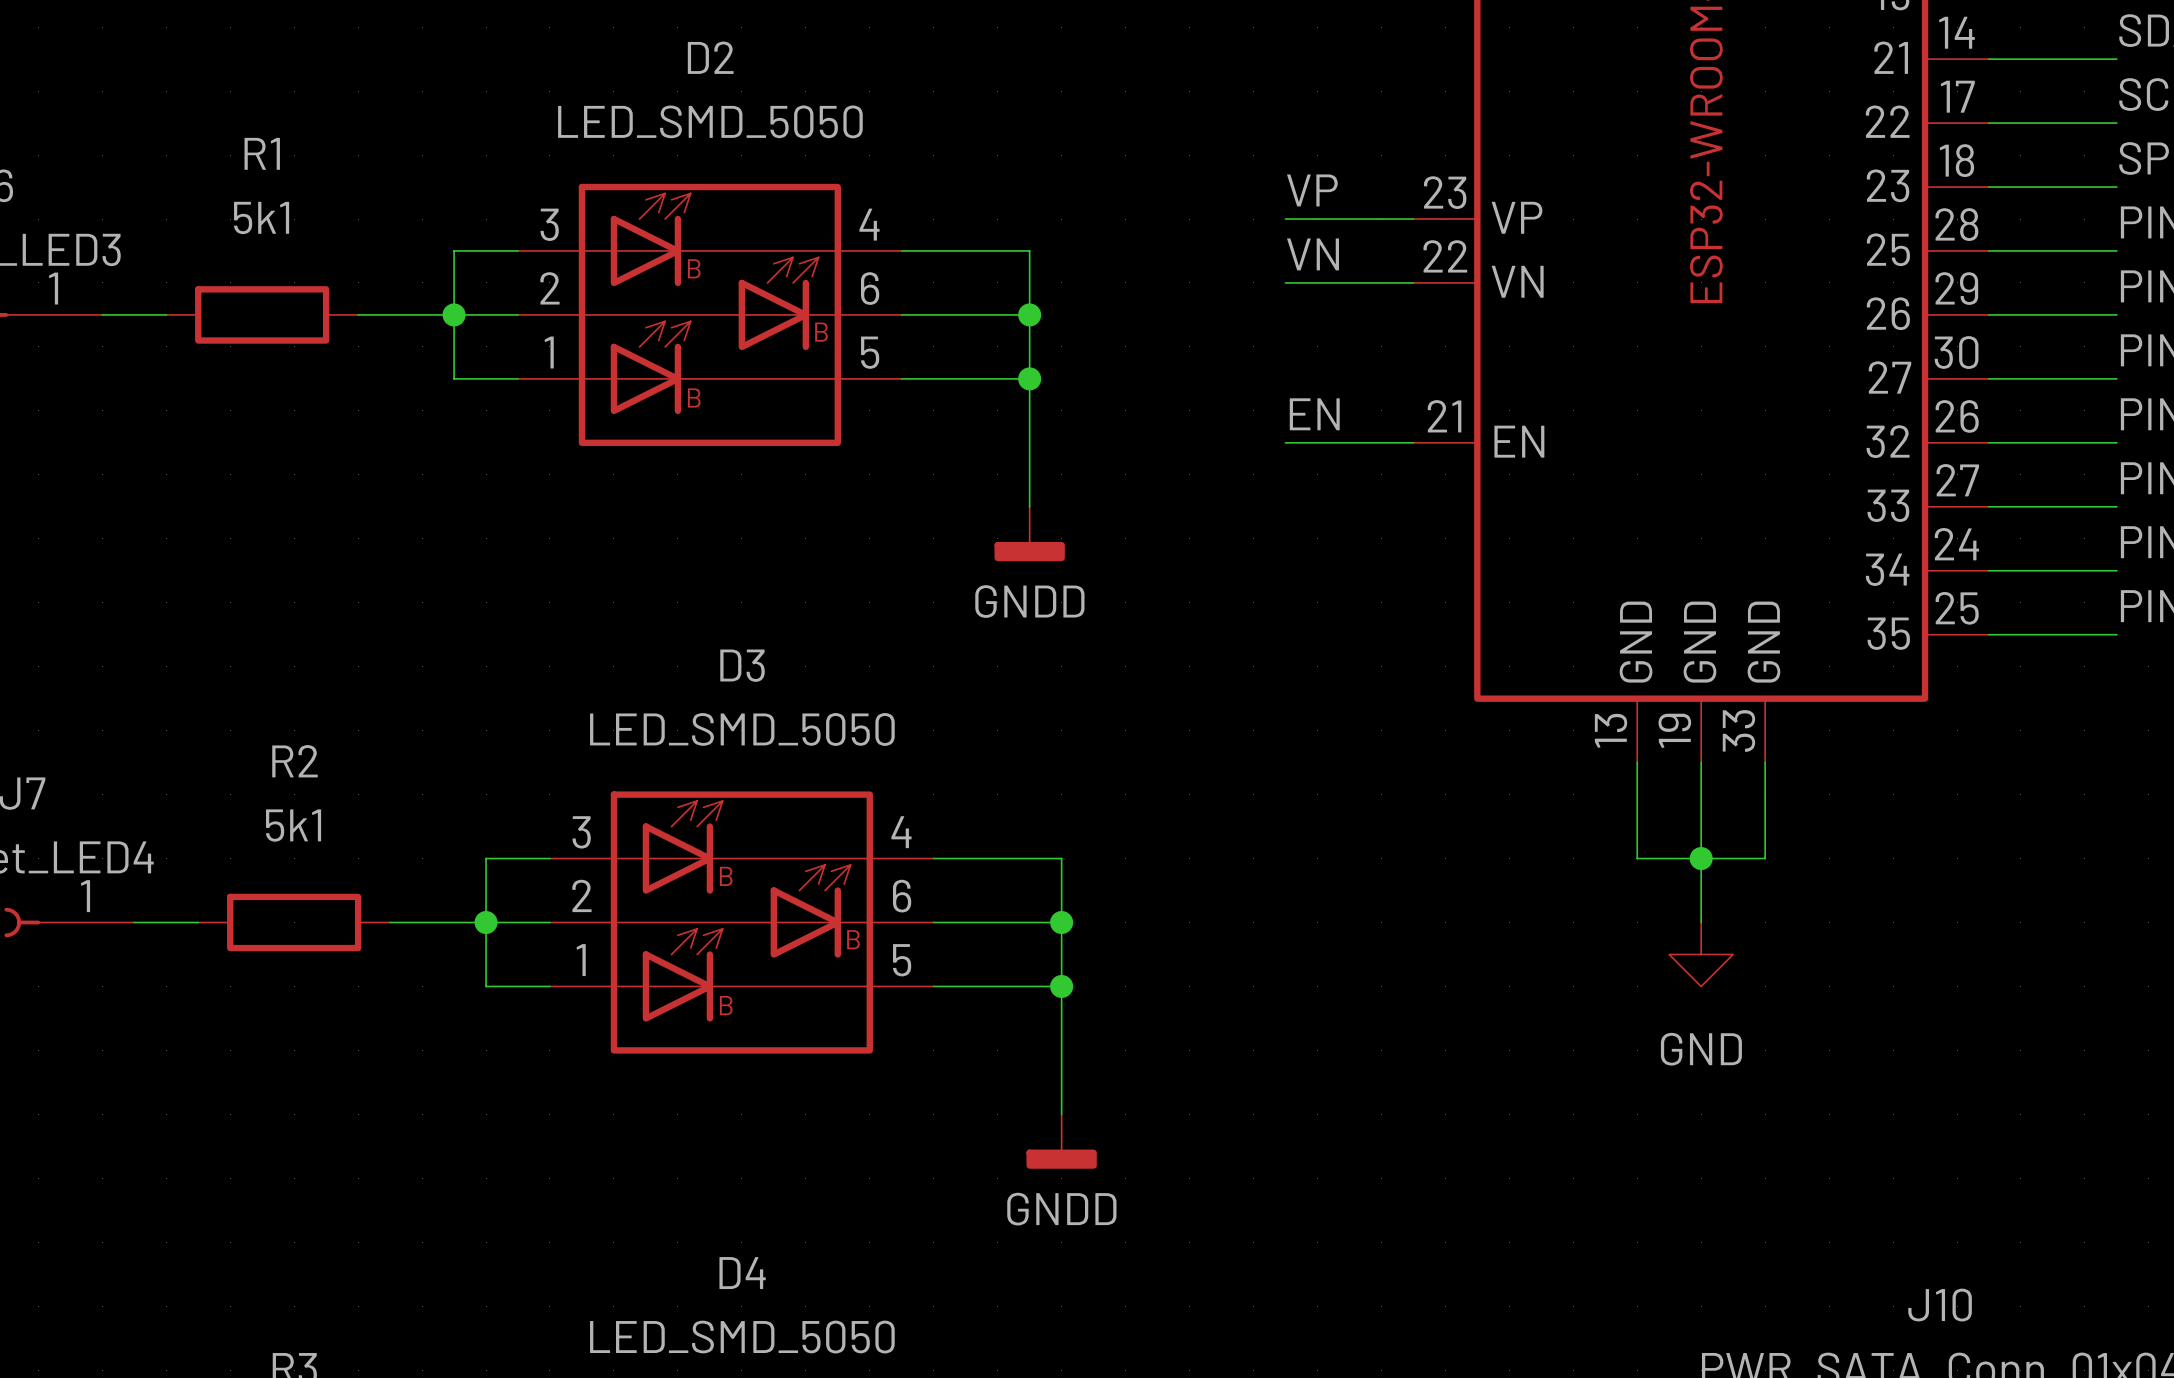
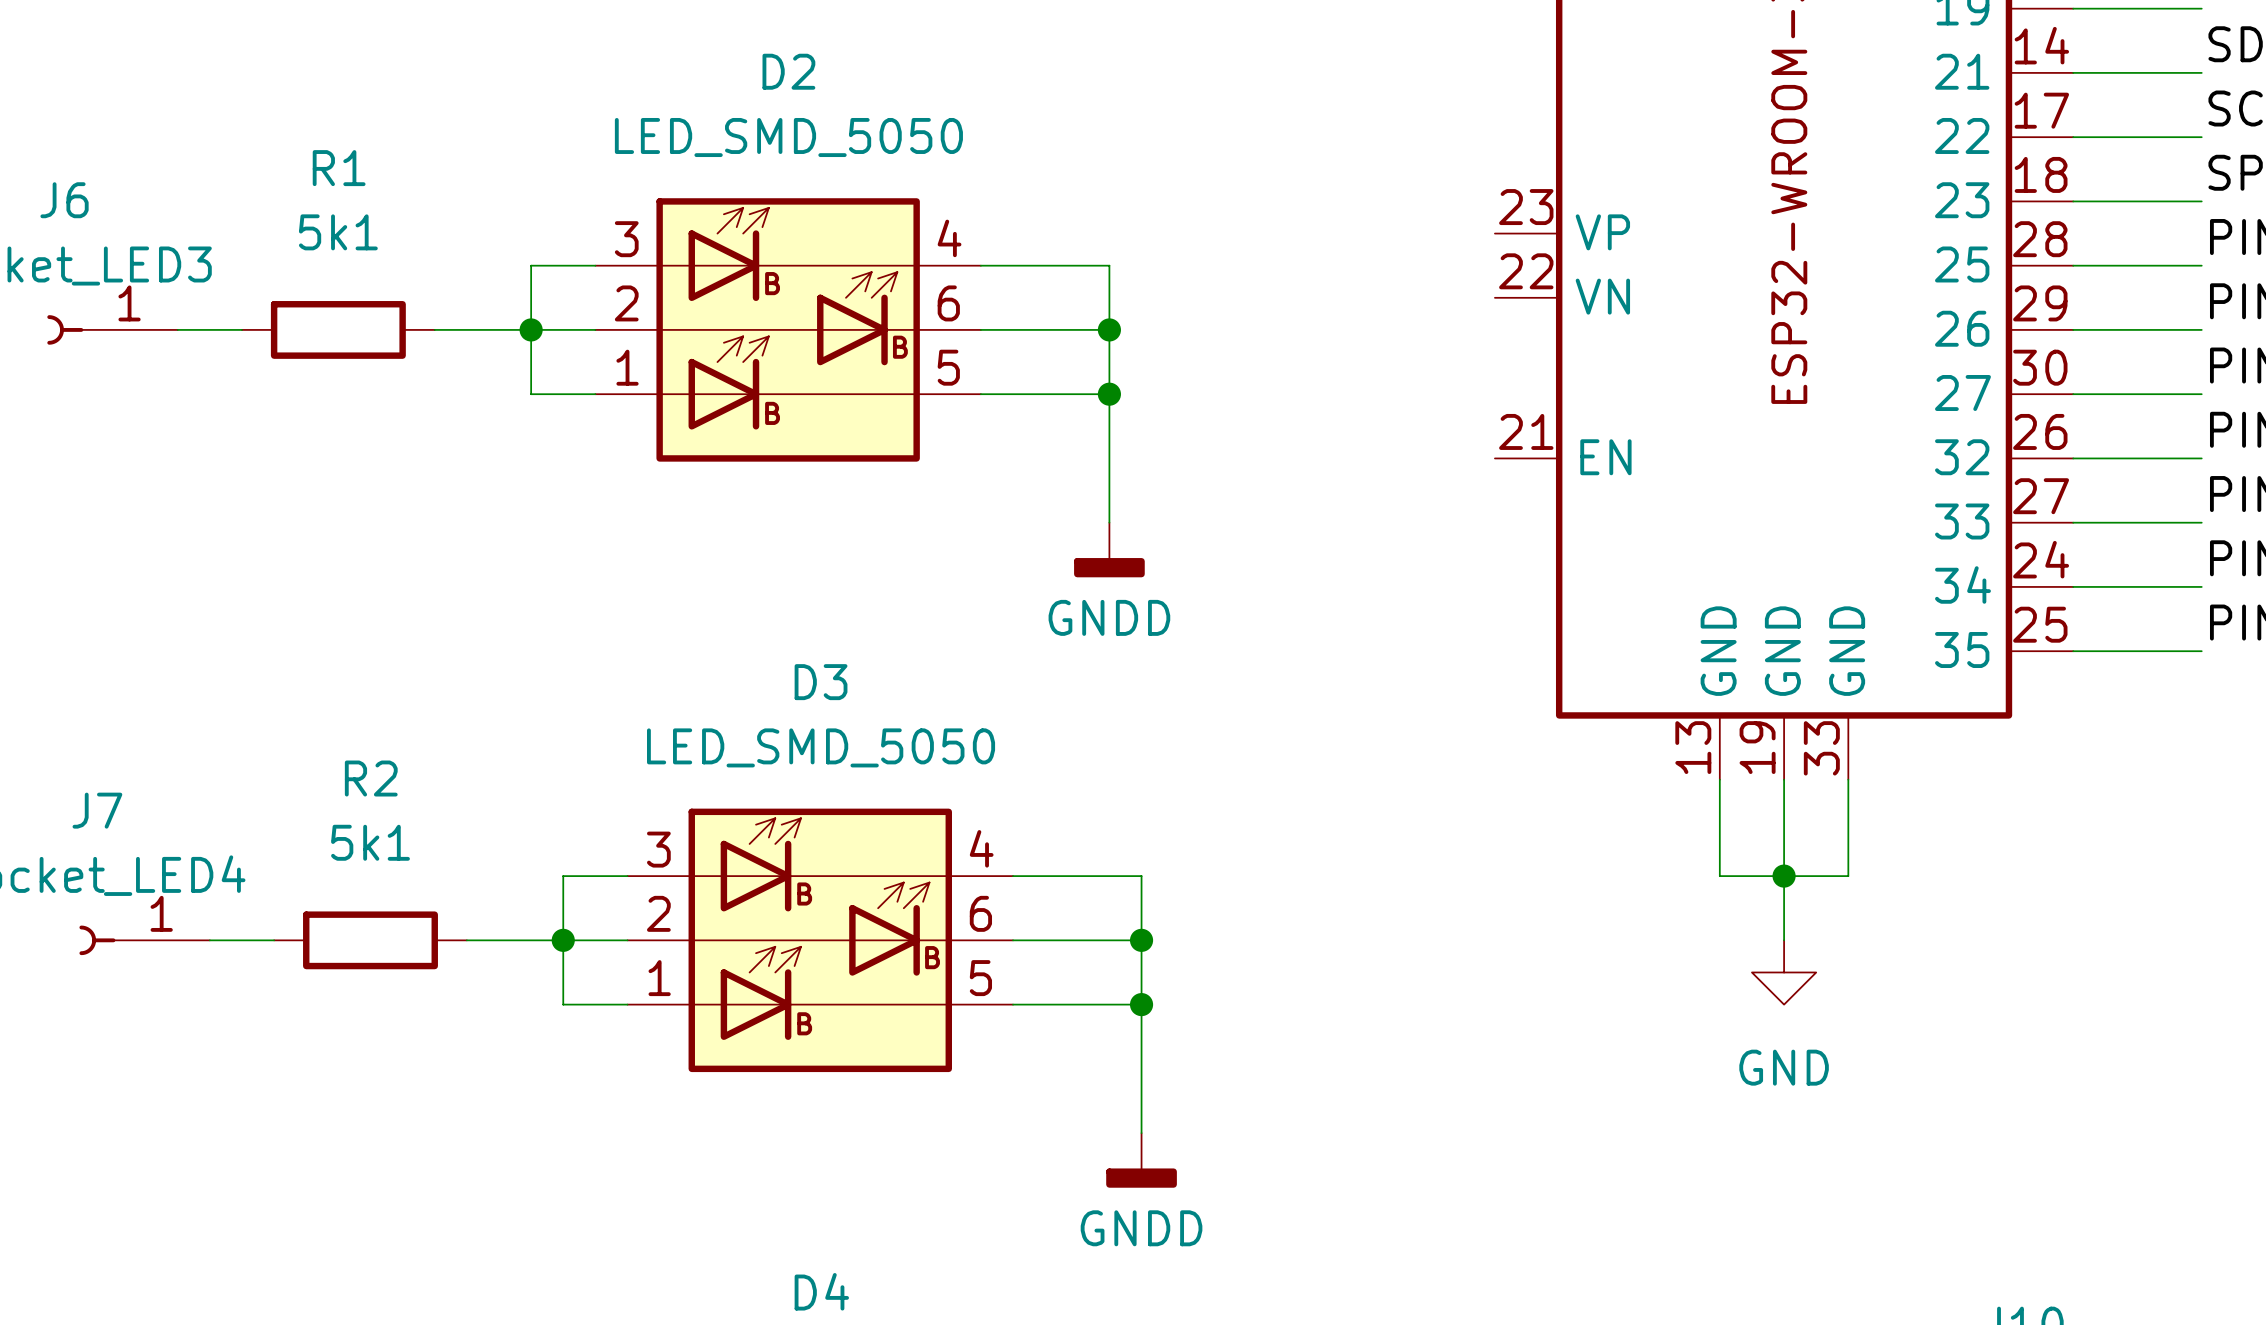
label: VP (1312, 190) -> none
wire: (1285, 219) (1413, 219) -> none
label: VN (1313, 254) -> none
wire: (1285, 282) (1413, 282) -> none
label: EN (1314, 414) -> none
wire: (1285, 442) (1413, 442) -> none

